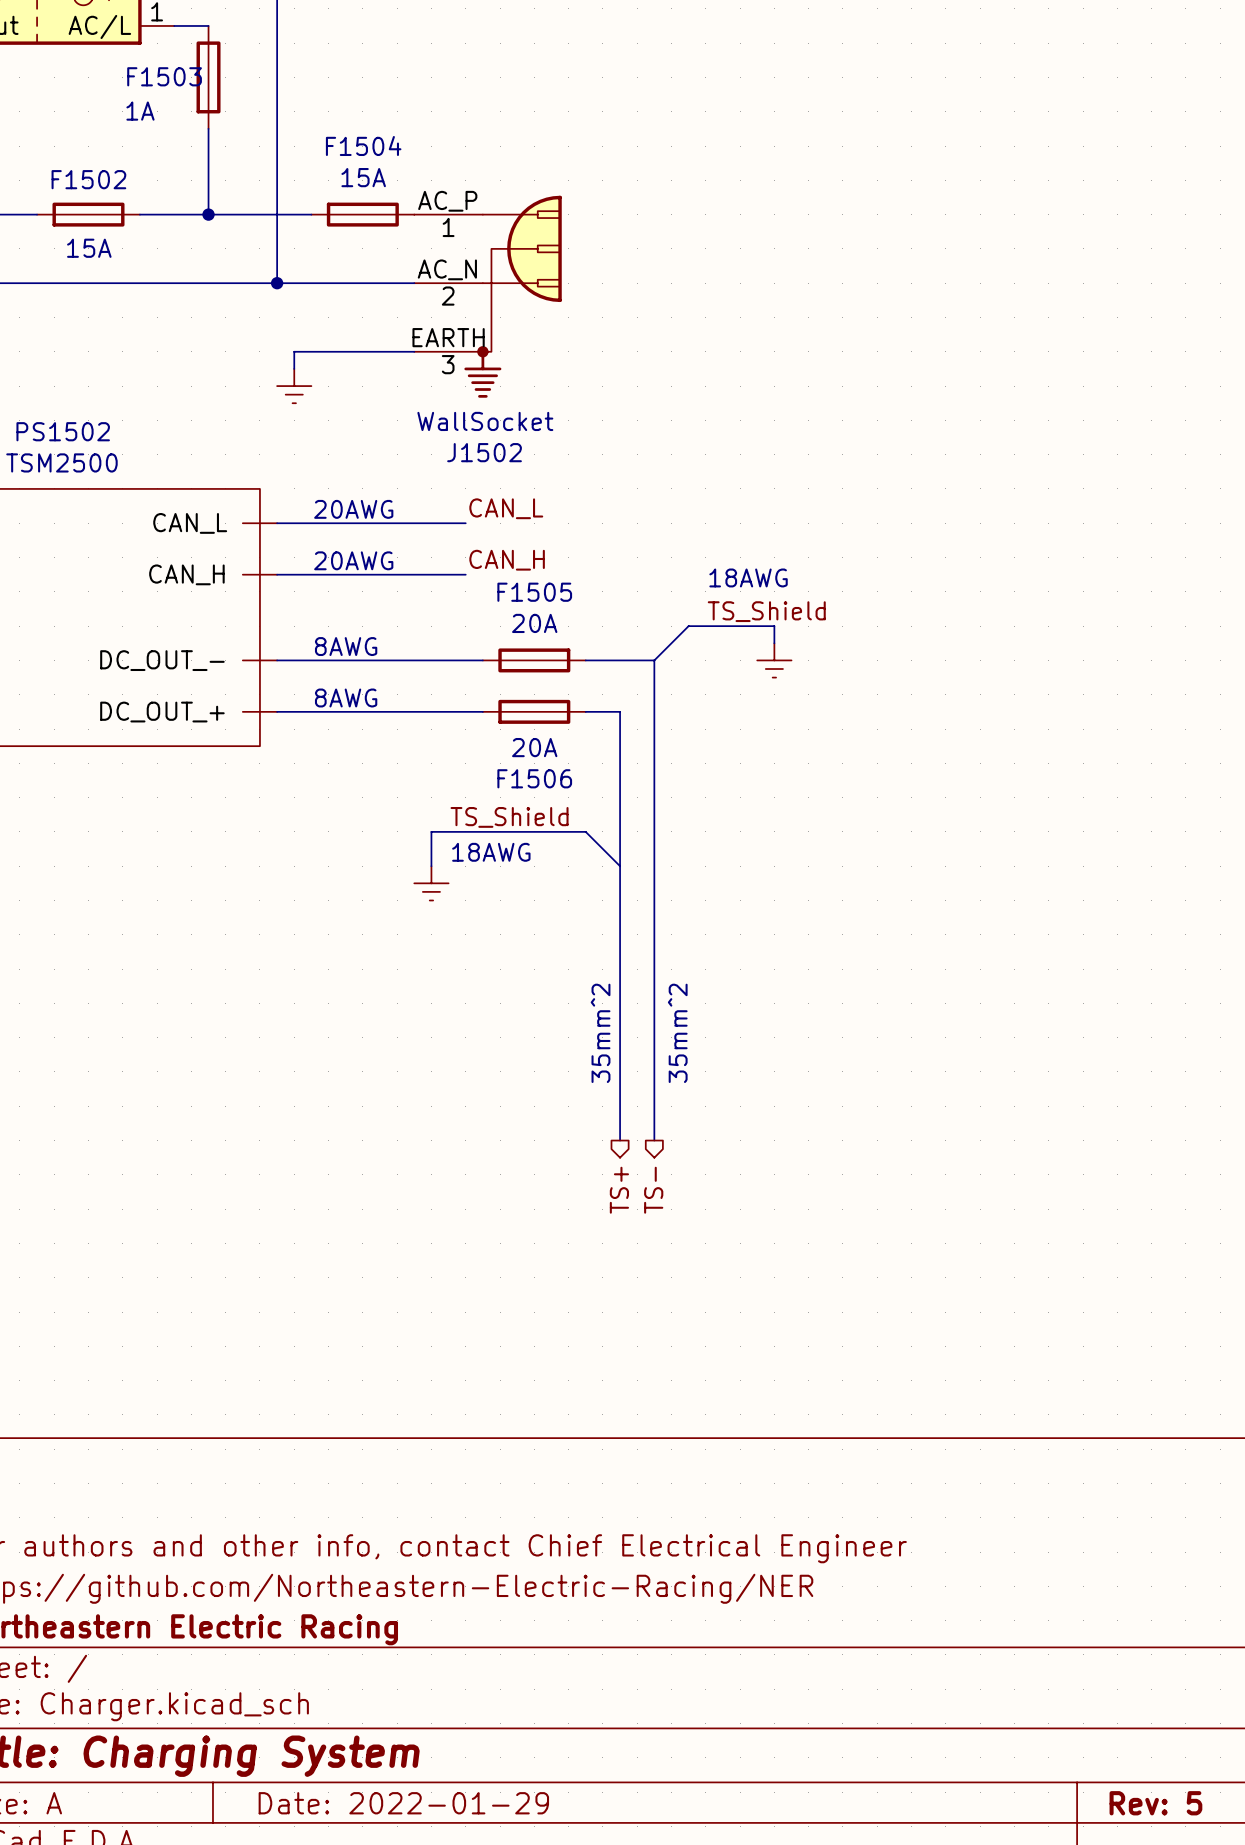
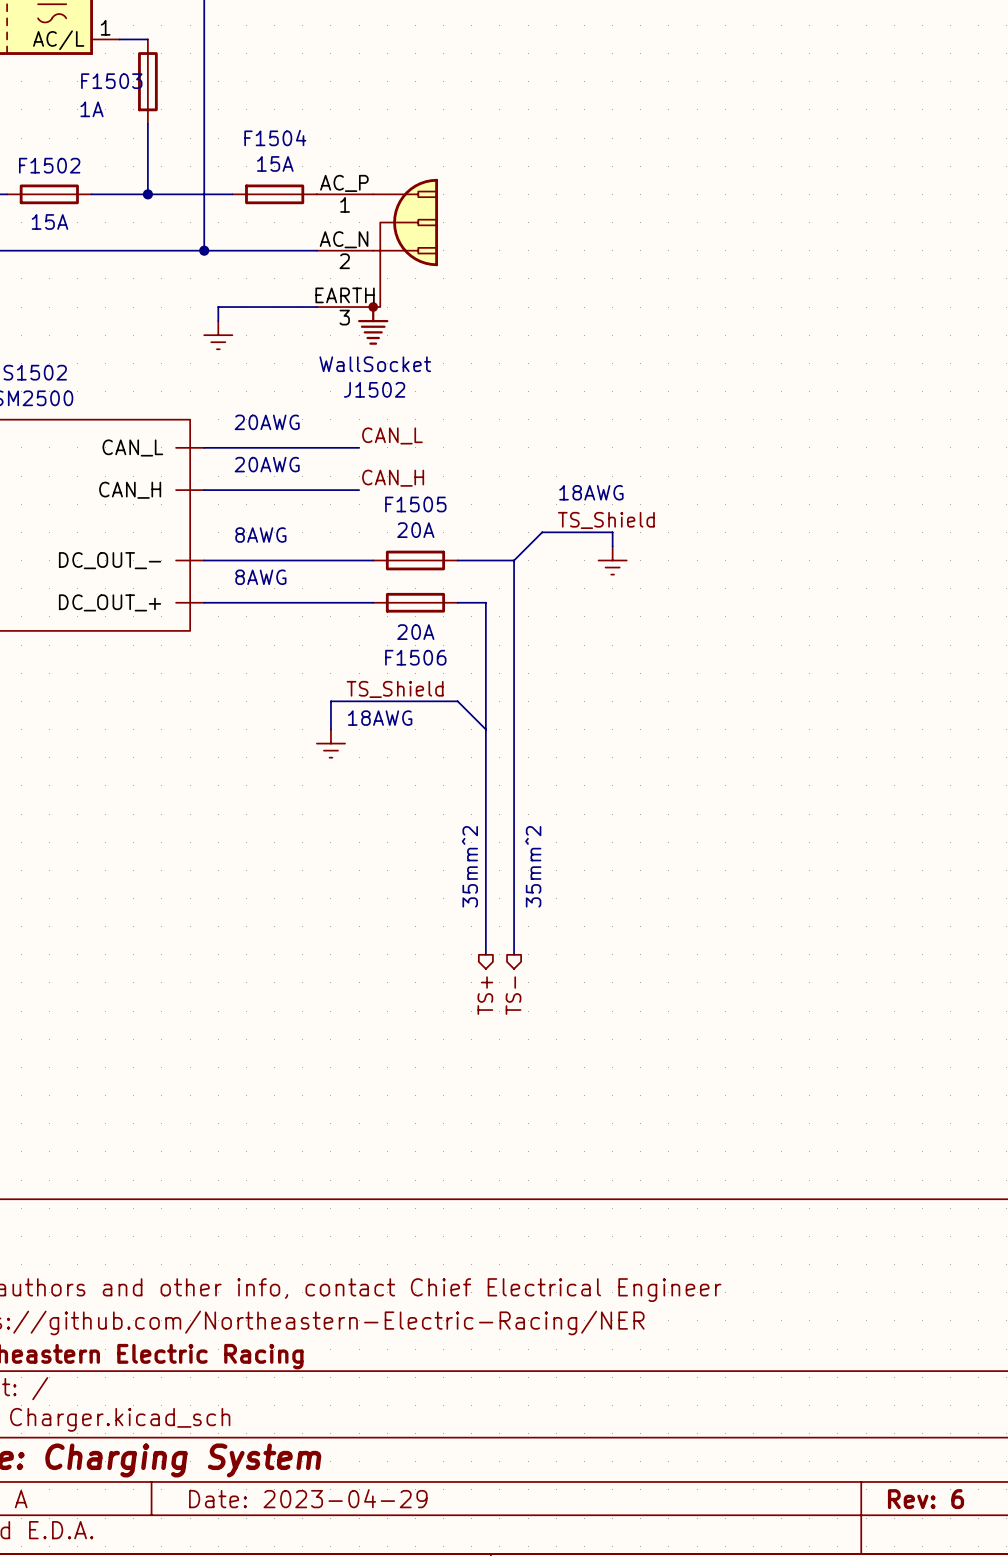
text: none -> 20AWG (267, 422)
text: 20AWG (353, 509) -> none
text: none -> 20AWG (267, 464)
text: 20AWG (353, 560) -> none
text: none -> 8AWG (260, 535)
text: 8AWG (346, 646) -> none
text: none -> 8AWG (260, 577)
text: 8AWG (346, 697) -> none
title block: Date: 2022-01-29 (403, 1803) -> Date: 2023-04-29 (308, 1498)
title block: Rev: 5 (1155, 1803) -> Rev: 6 (926, 1499)

